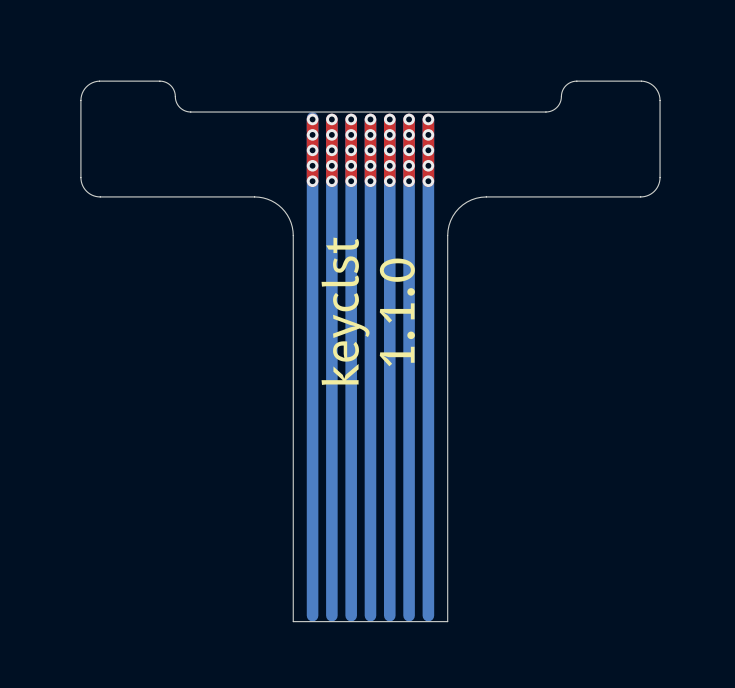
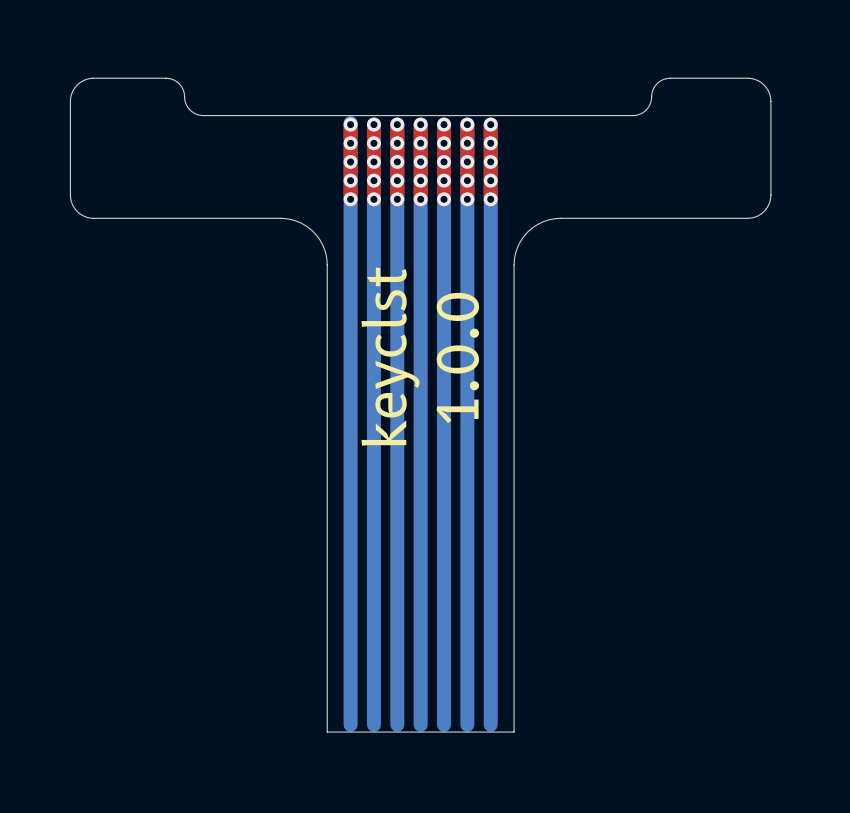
text: 1.1.0 (397, 312) -> 1.0.0 (457, 358)

